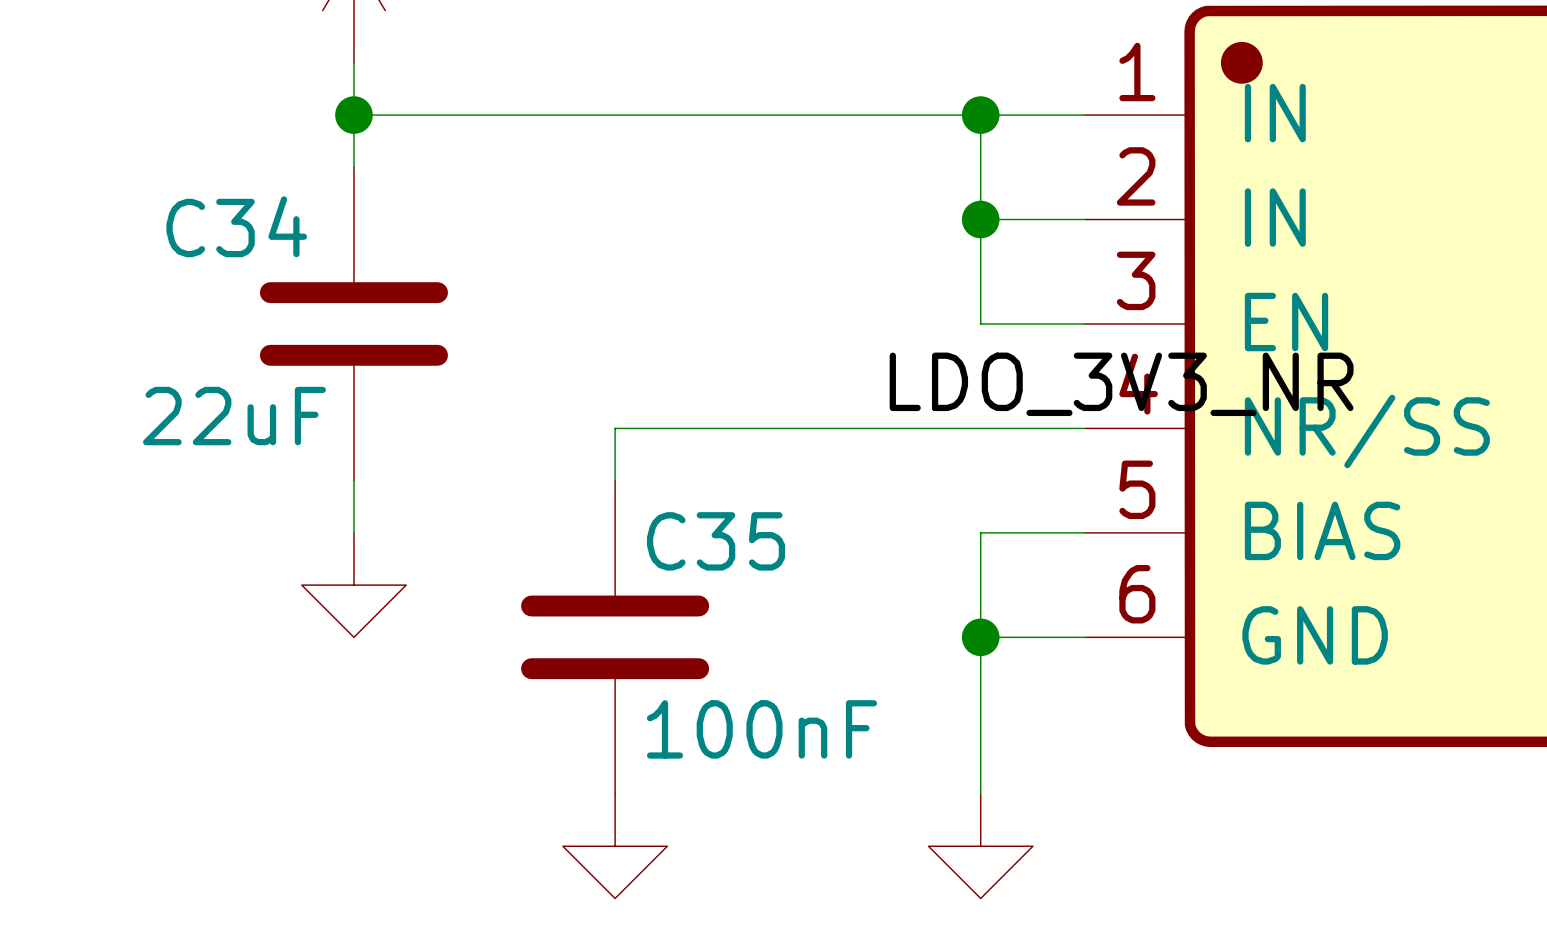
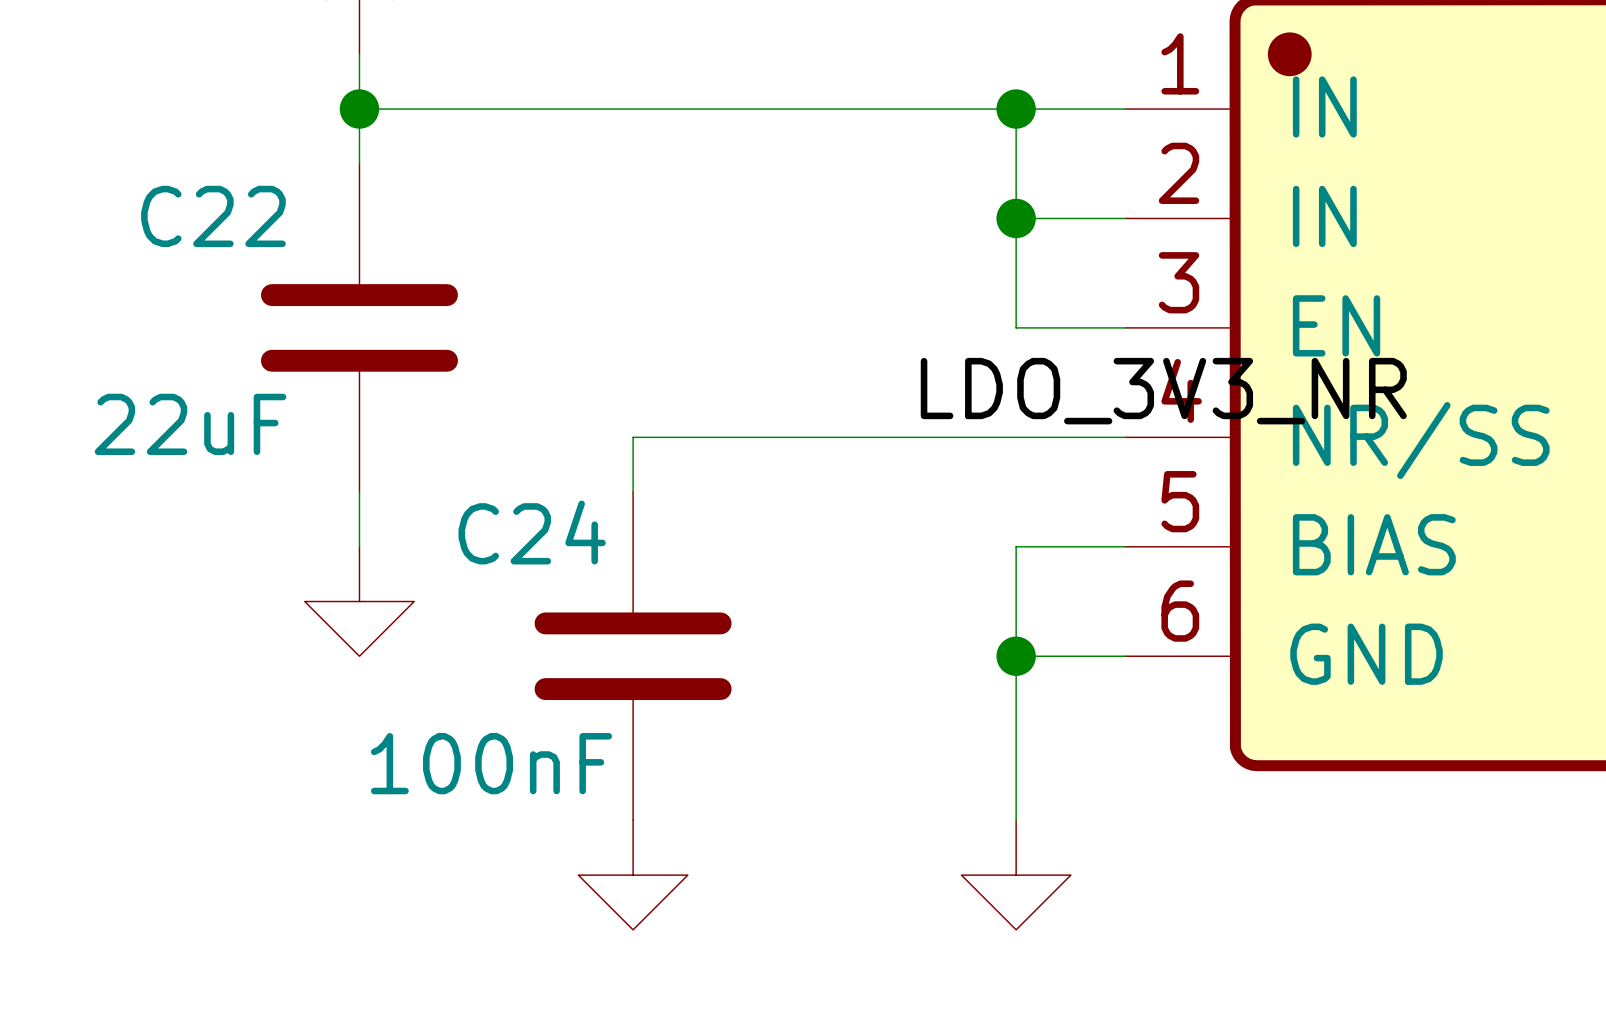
C34 name: C34 (236, 226) -> C22 (213, 216)
C34 value position: 22uF (234, 416) -> 22uF (190, 424)
C35 name: C35 (715, 541) -> C24 (532, 532)
C35 value position: 100nF (761, 729) -> 100nF (491, 763)

